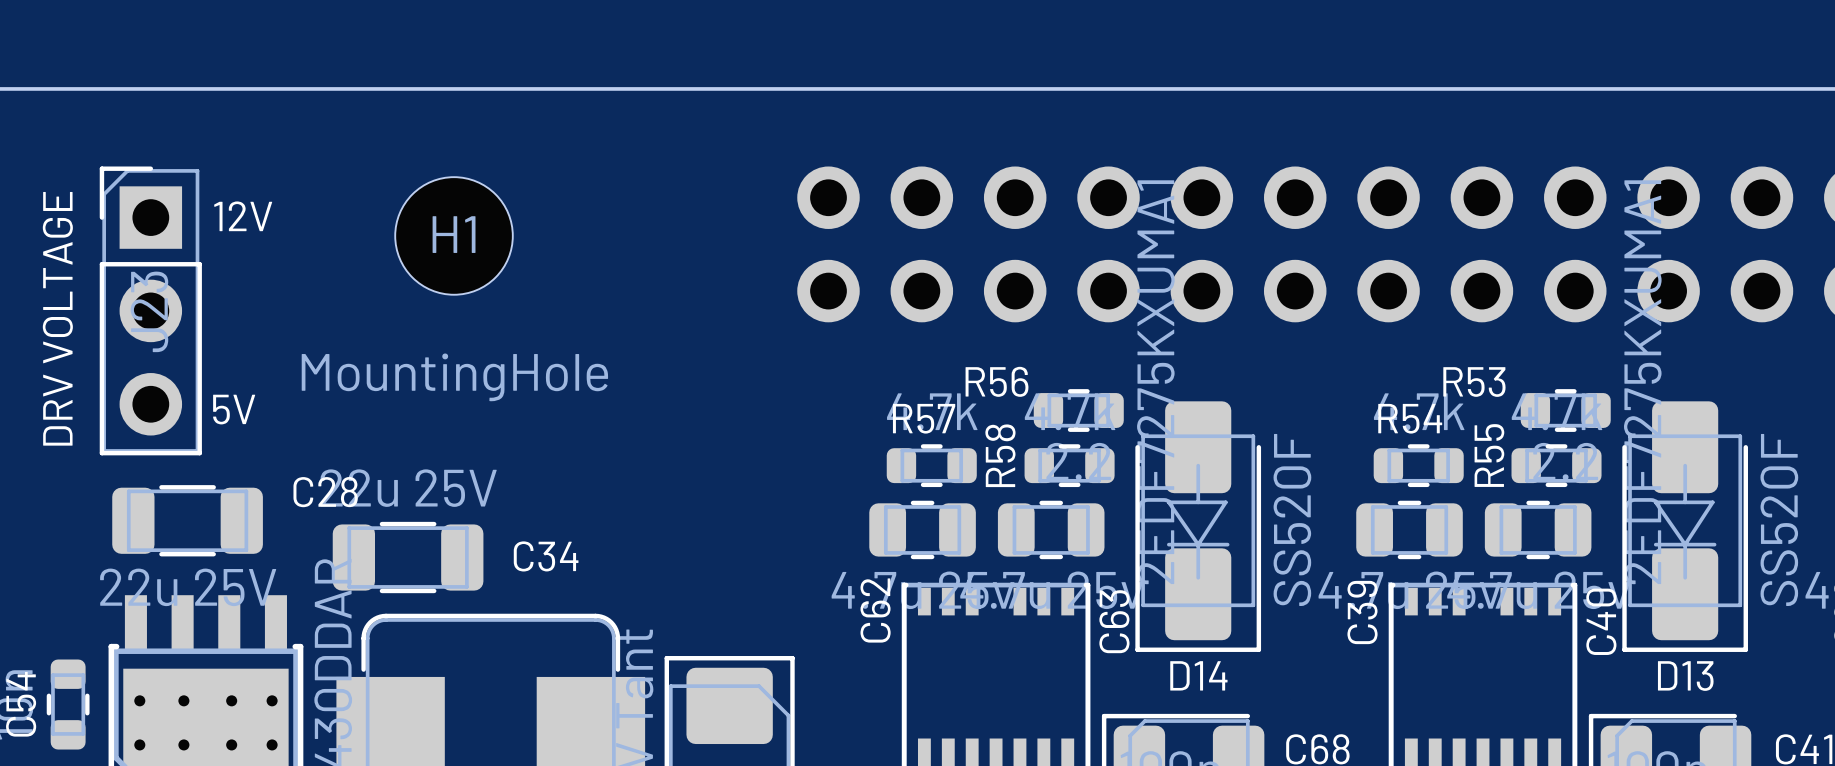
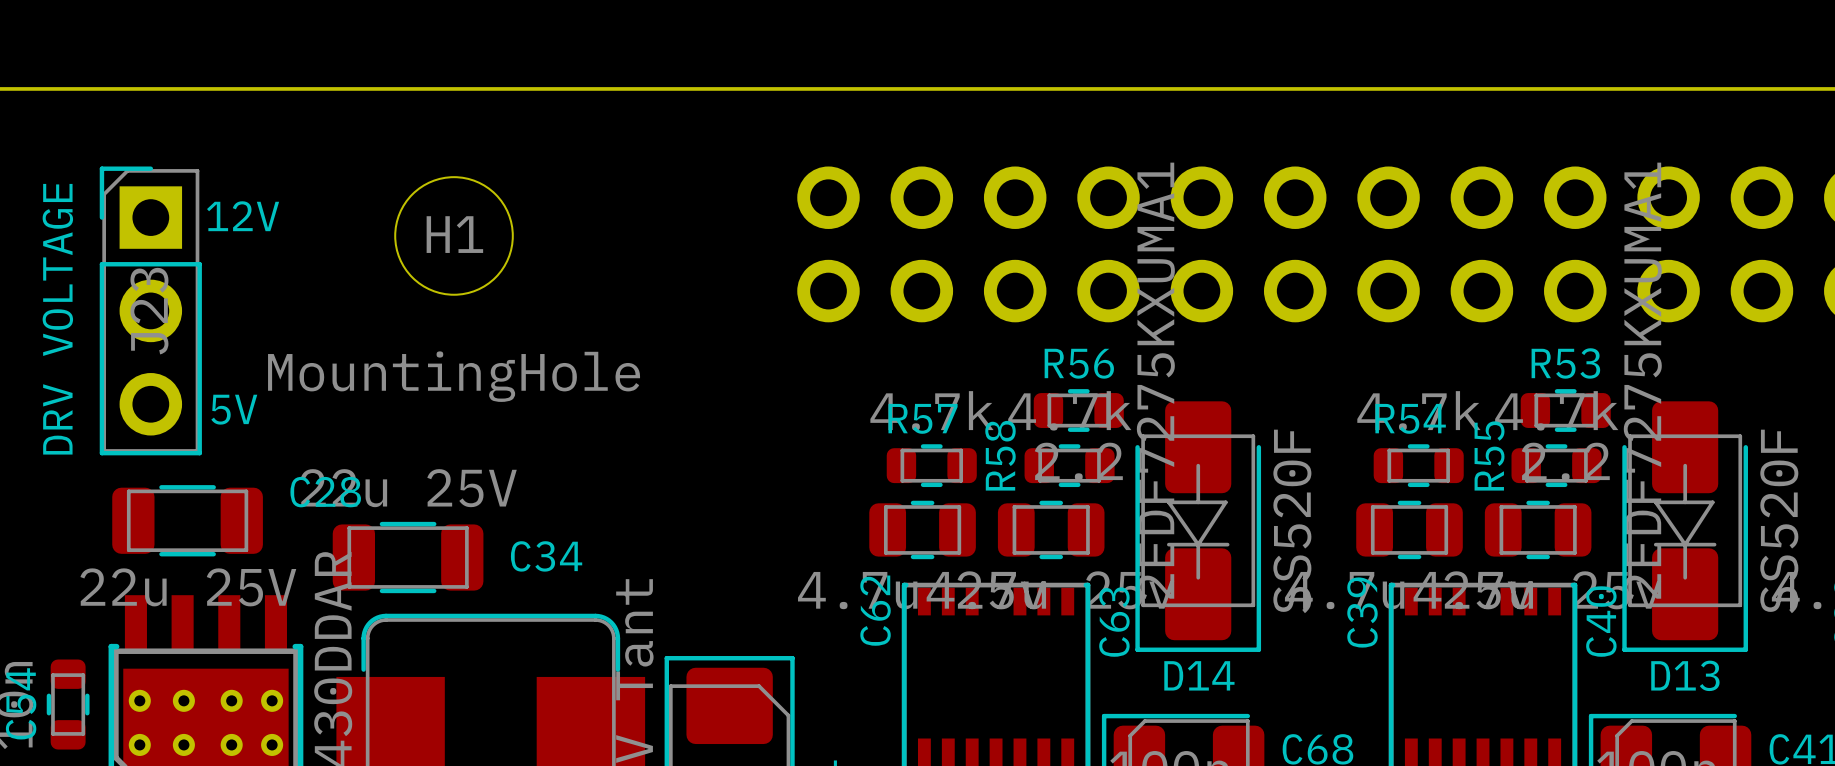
R56 name position: R56 (997, 381) -> R56 (1079, 363)
R53 name position: R53 (1474, 382) -> R53 (1565, 363)

